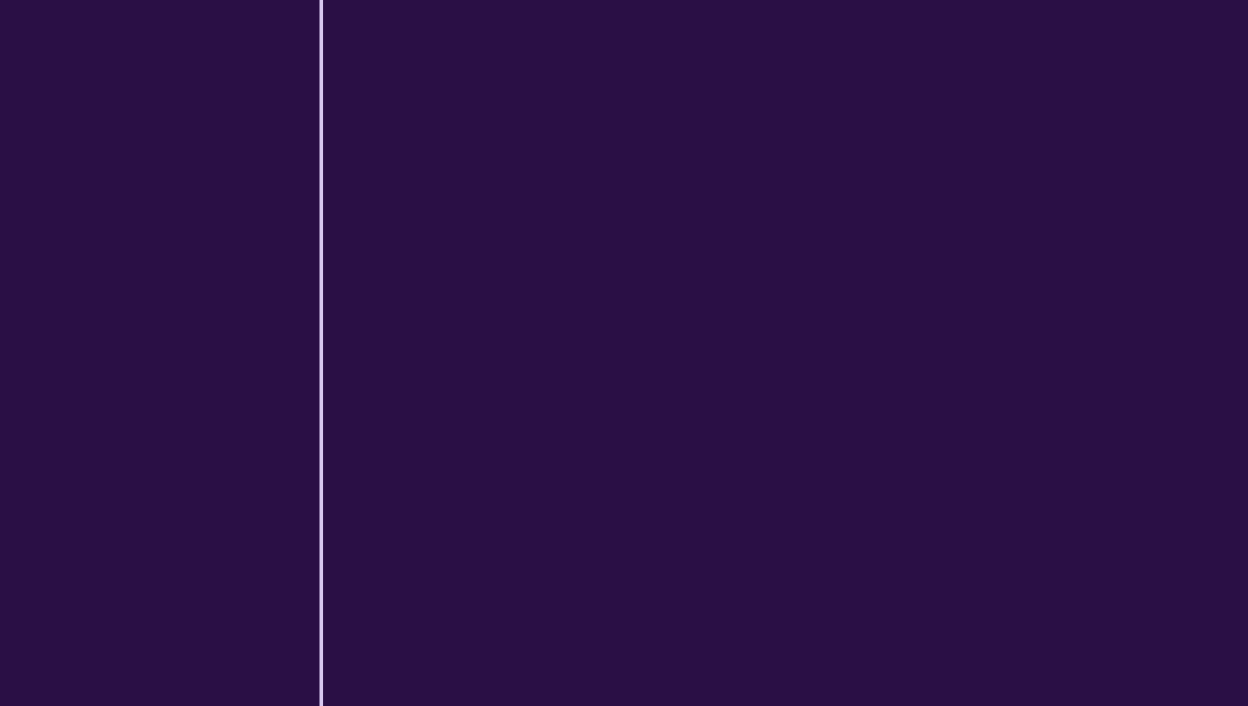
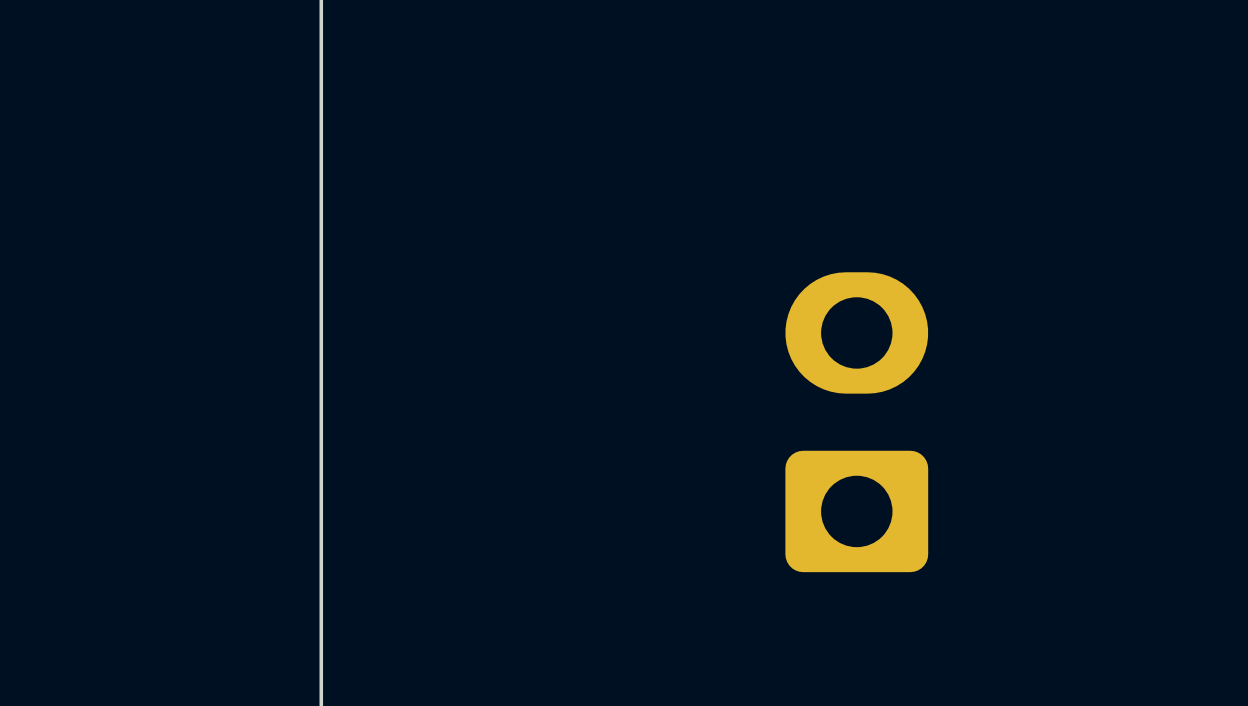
part: none -> (856, 422)

